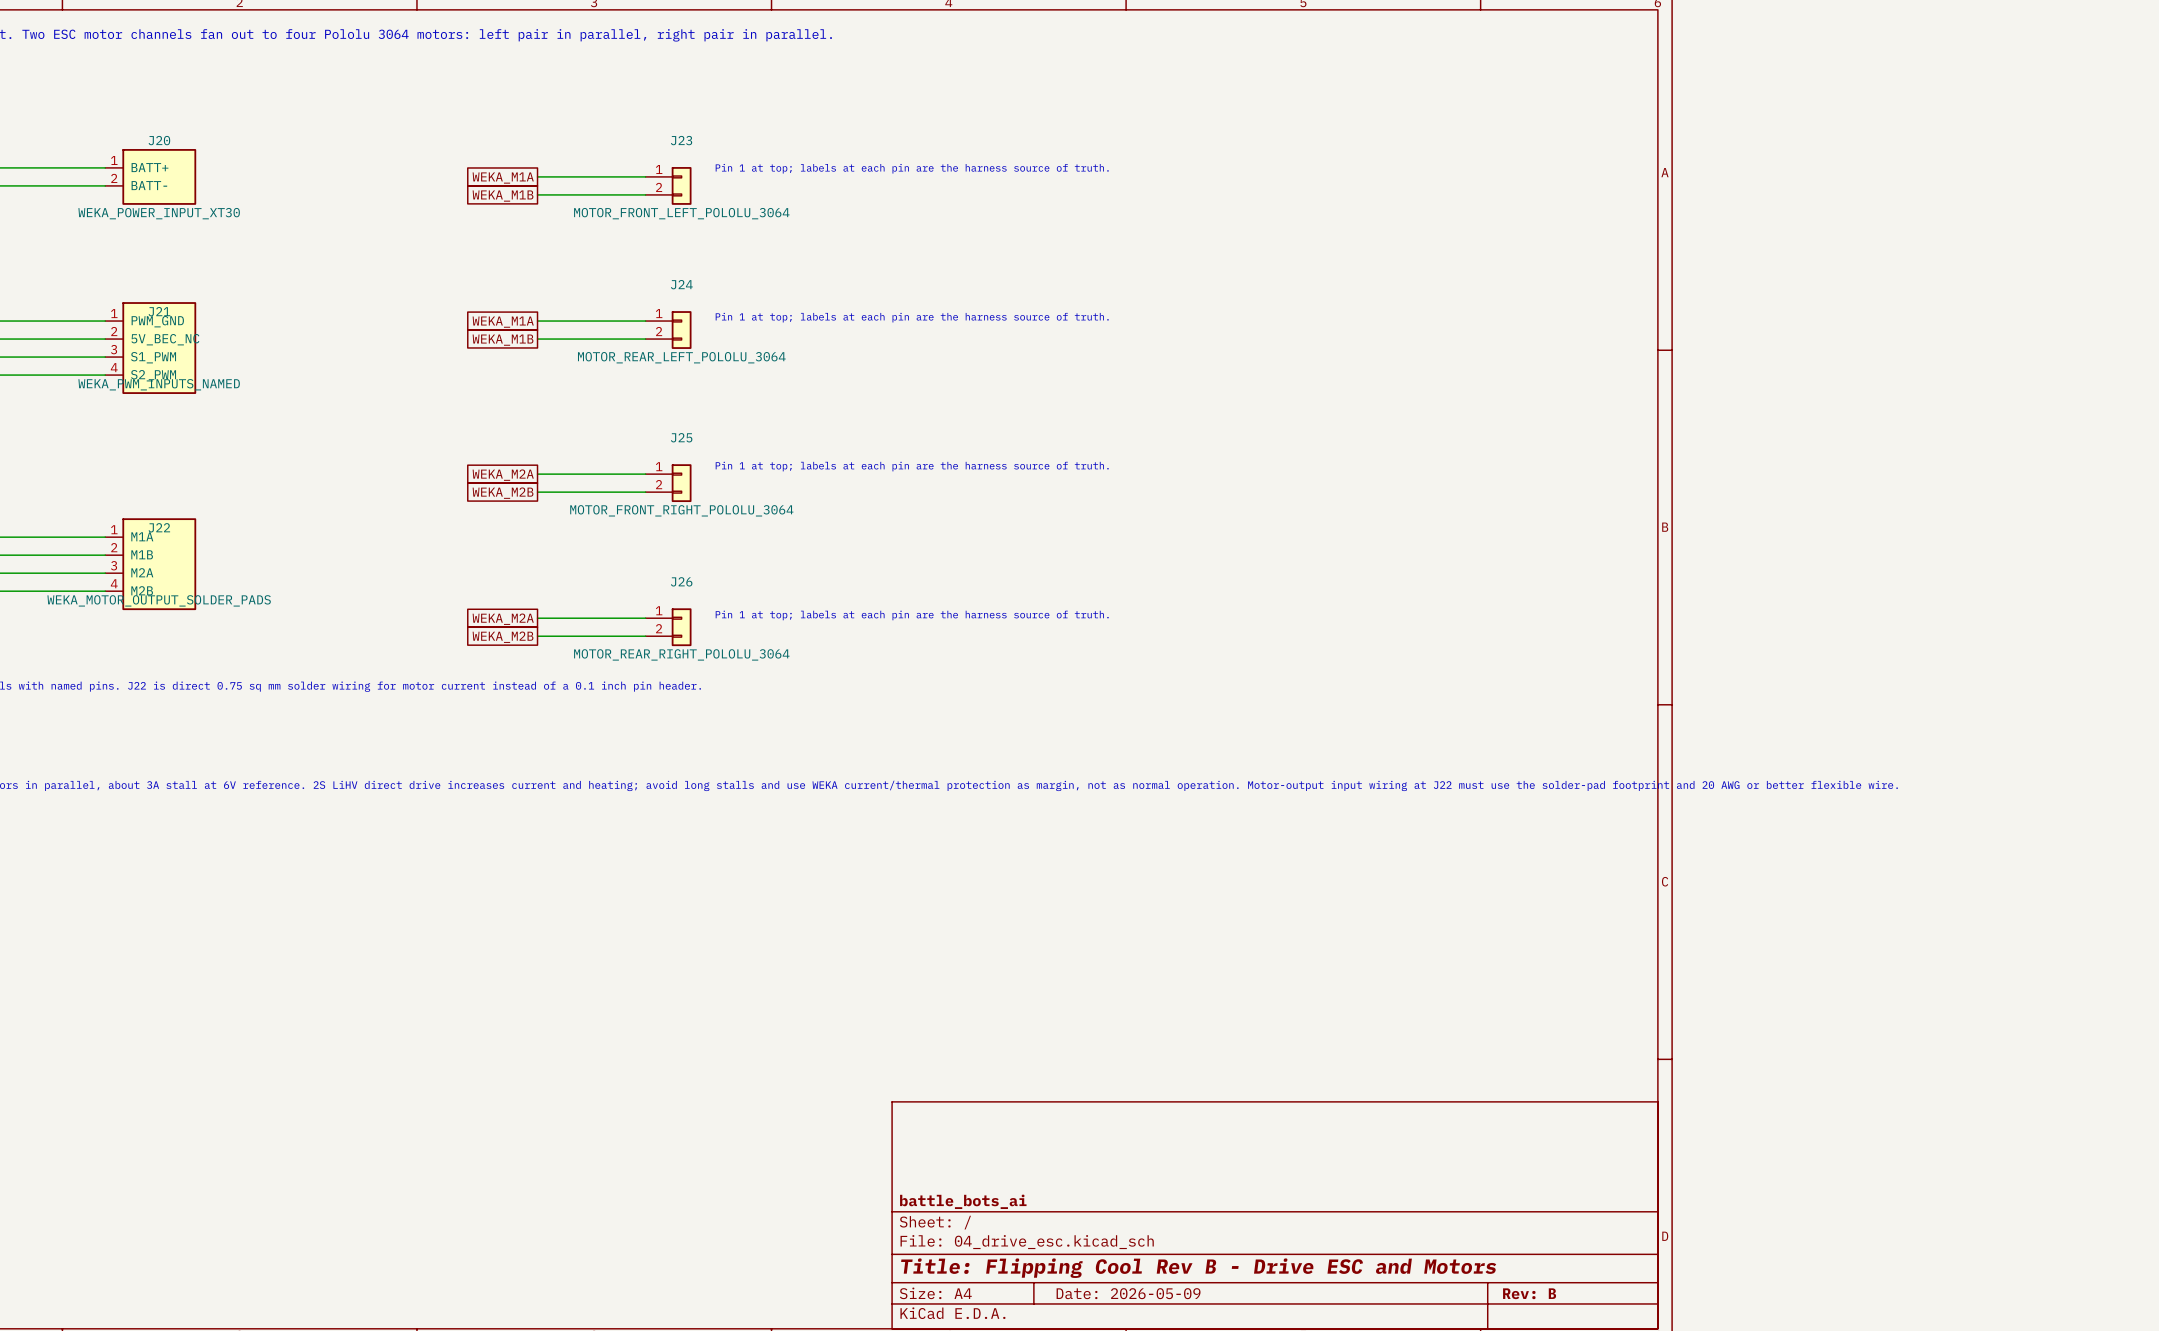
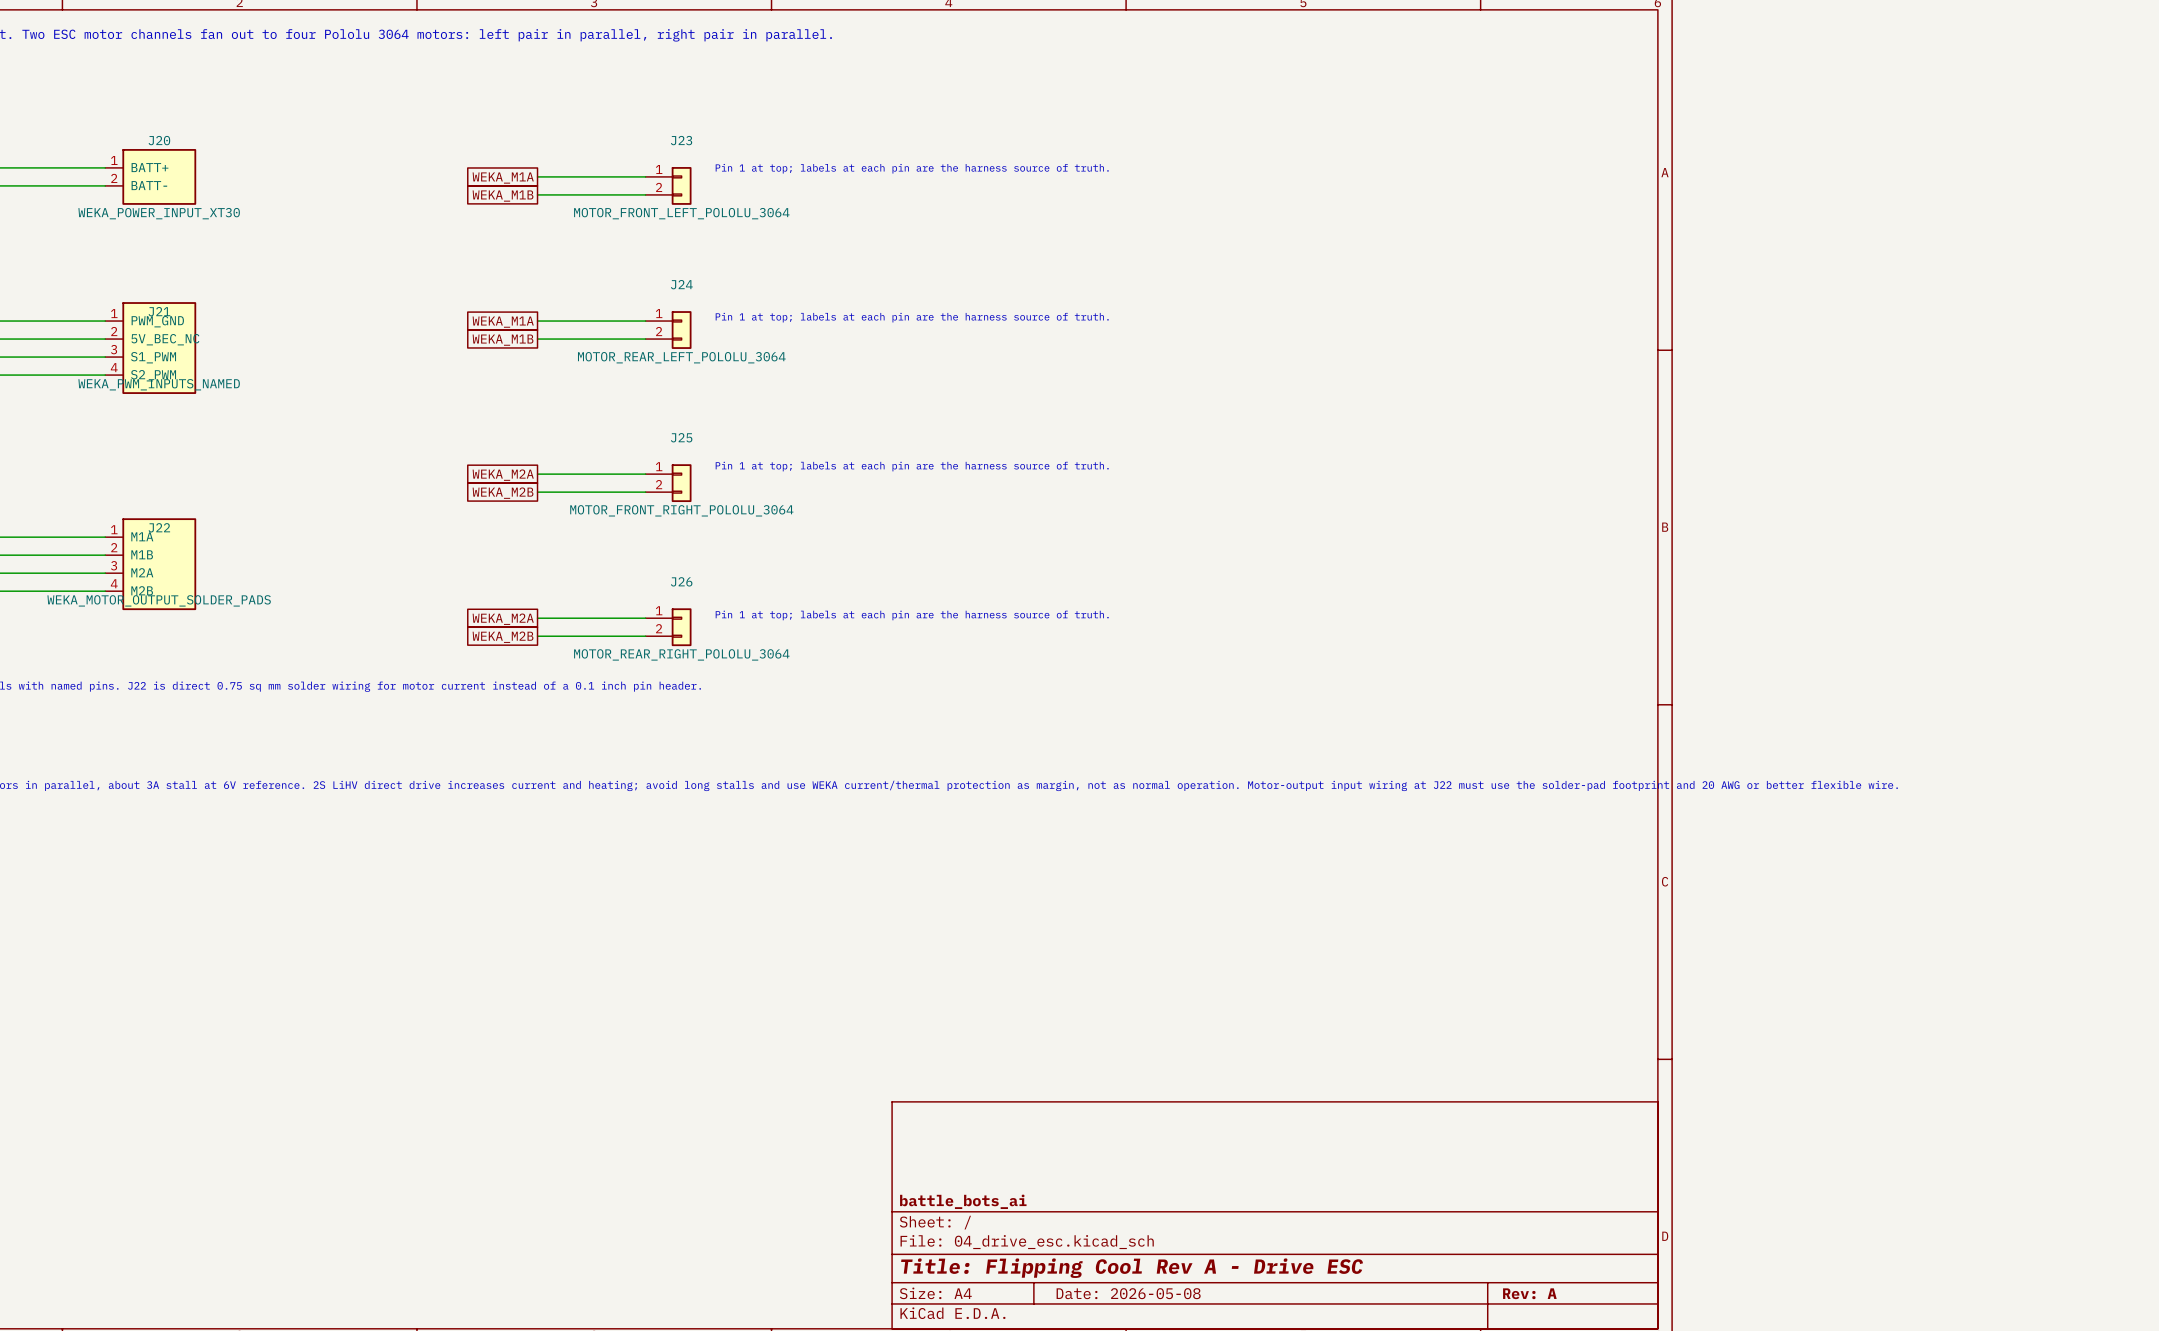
title block: Title: Flipping Cool Rev B - Drive ESC and Motors (1198, 1268) -> Title: Flipping Cool Rev A - Drive ESC (1132, 1268)
title block: Date: 2026-05-09 (1128, 1293) -> Date: 2026-05-08 (1128, 1293)
title block: Rev: B (1529, 1293) -> Rev: A (1529, 1293)

